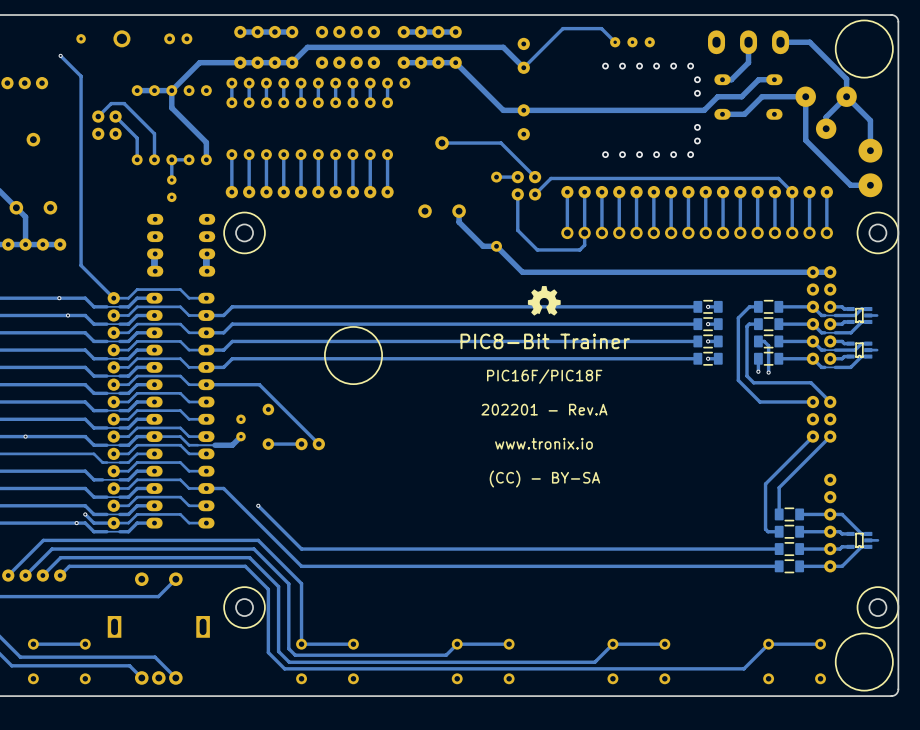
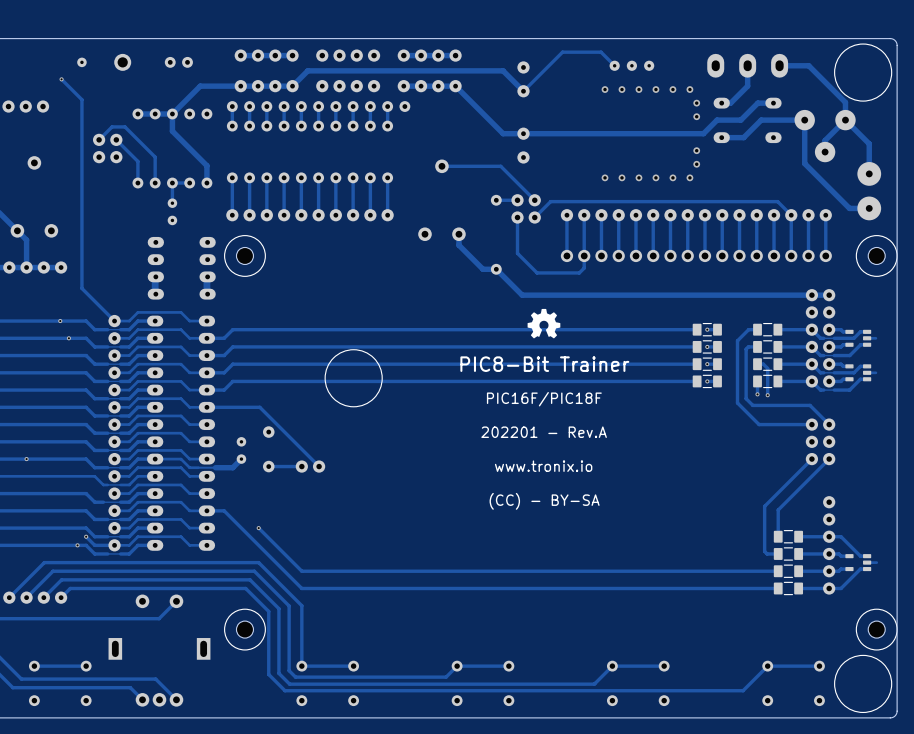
part footprint: [846, 306, 873, 325] -> [845, 329, 872, 347]
part footprint: [846, 341, 873, 359] -> [845, 364, 872, 382]
part footprint: [846, 531, 873, 549] -> [845, 554, 872, 572]

